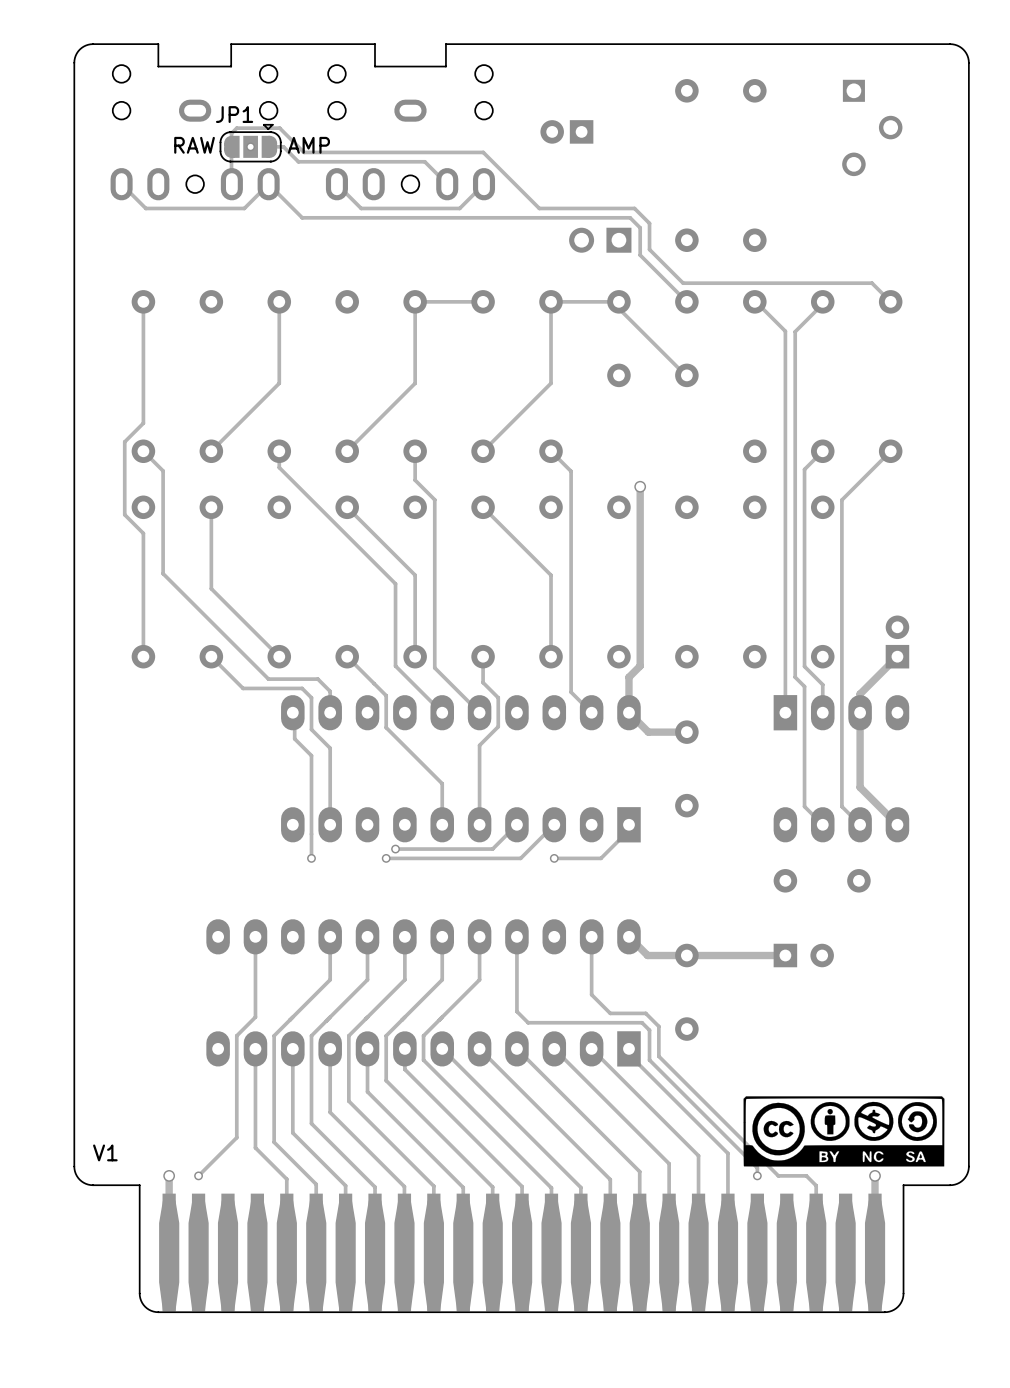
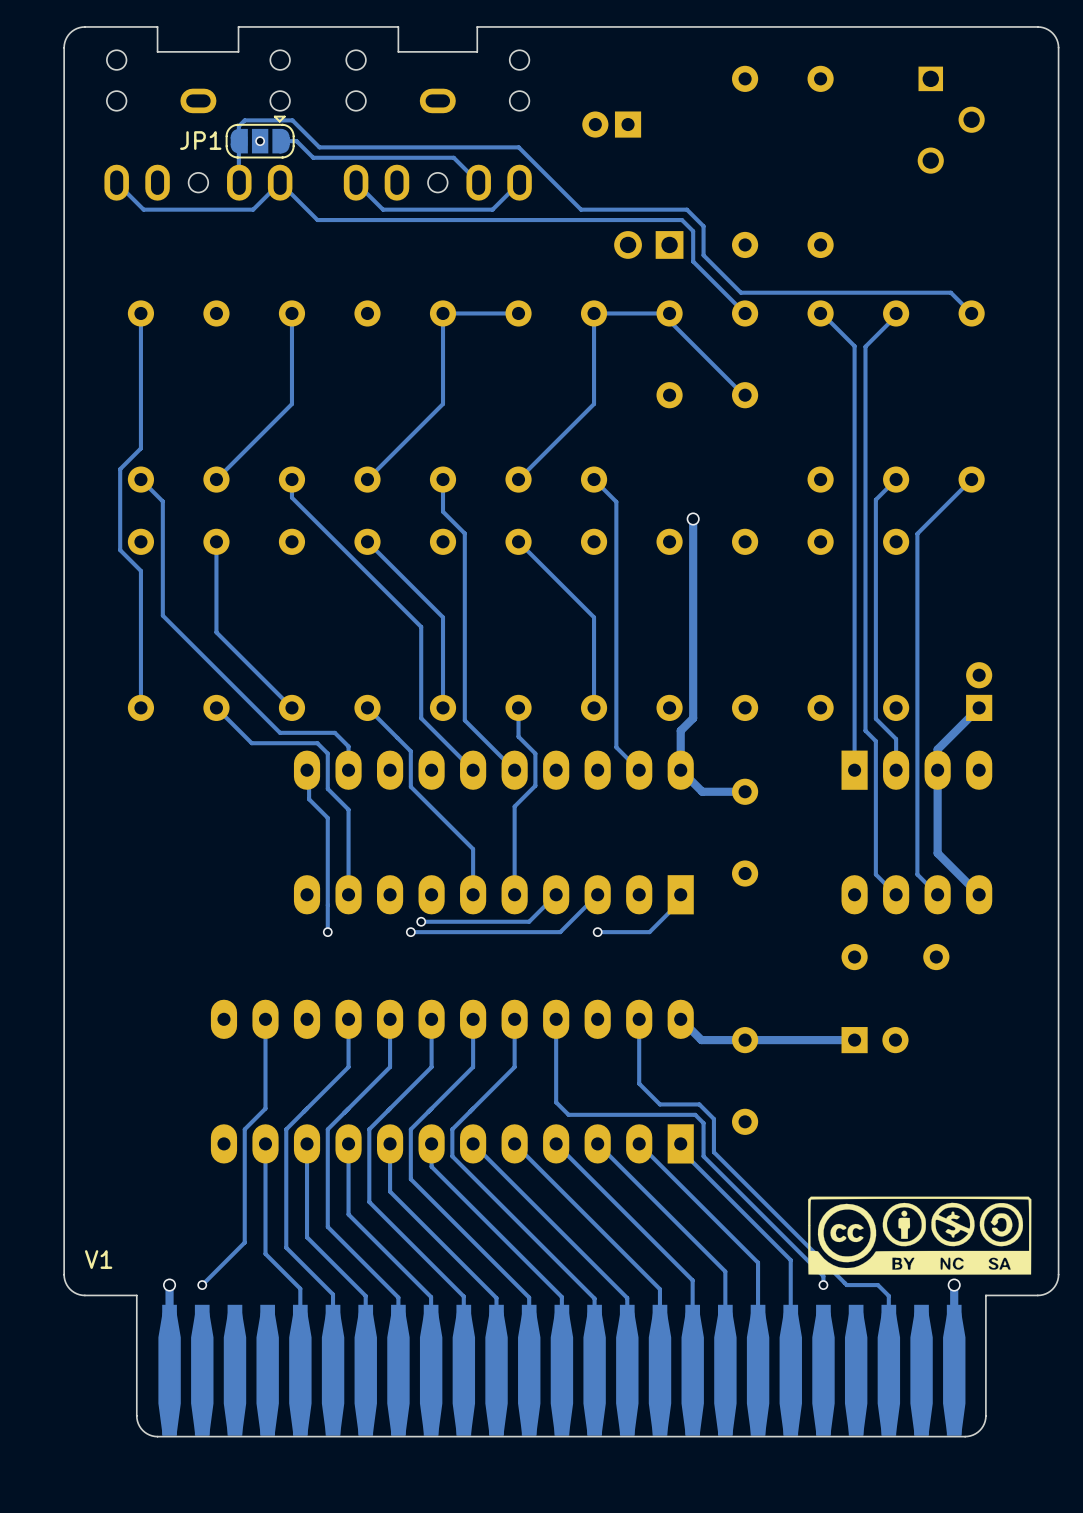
JP1 name position: JP1 (234, 114) -> JP1 (200, 140)
text: RAW (194, 145) -> none
text: AMP (308, 145) -> none

